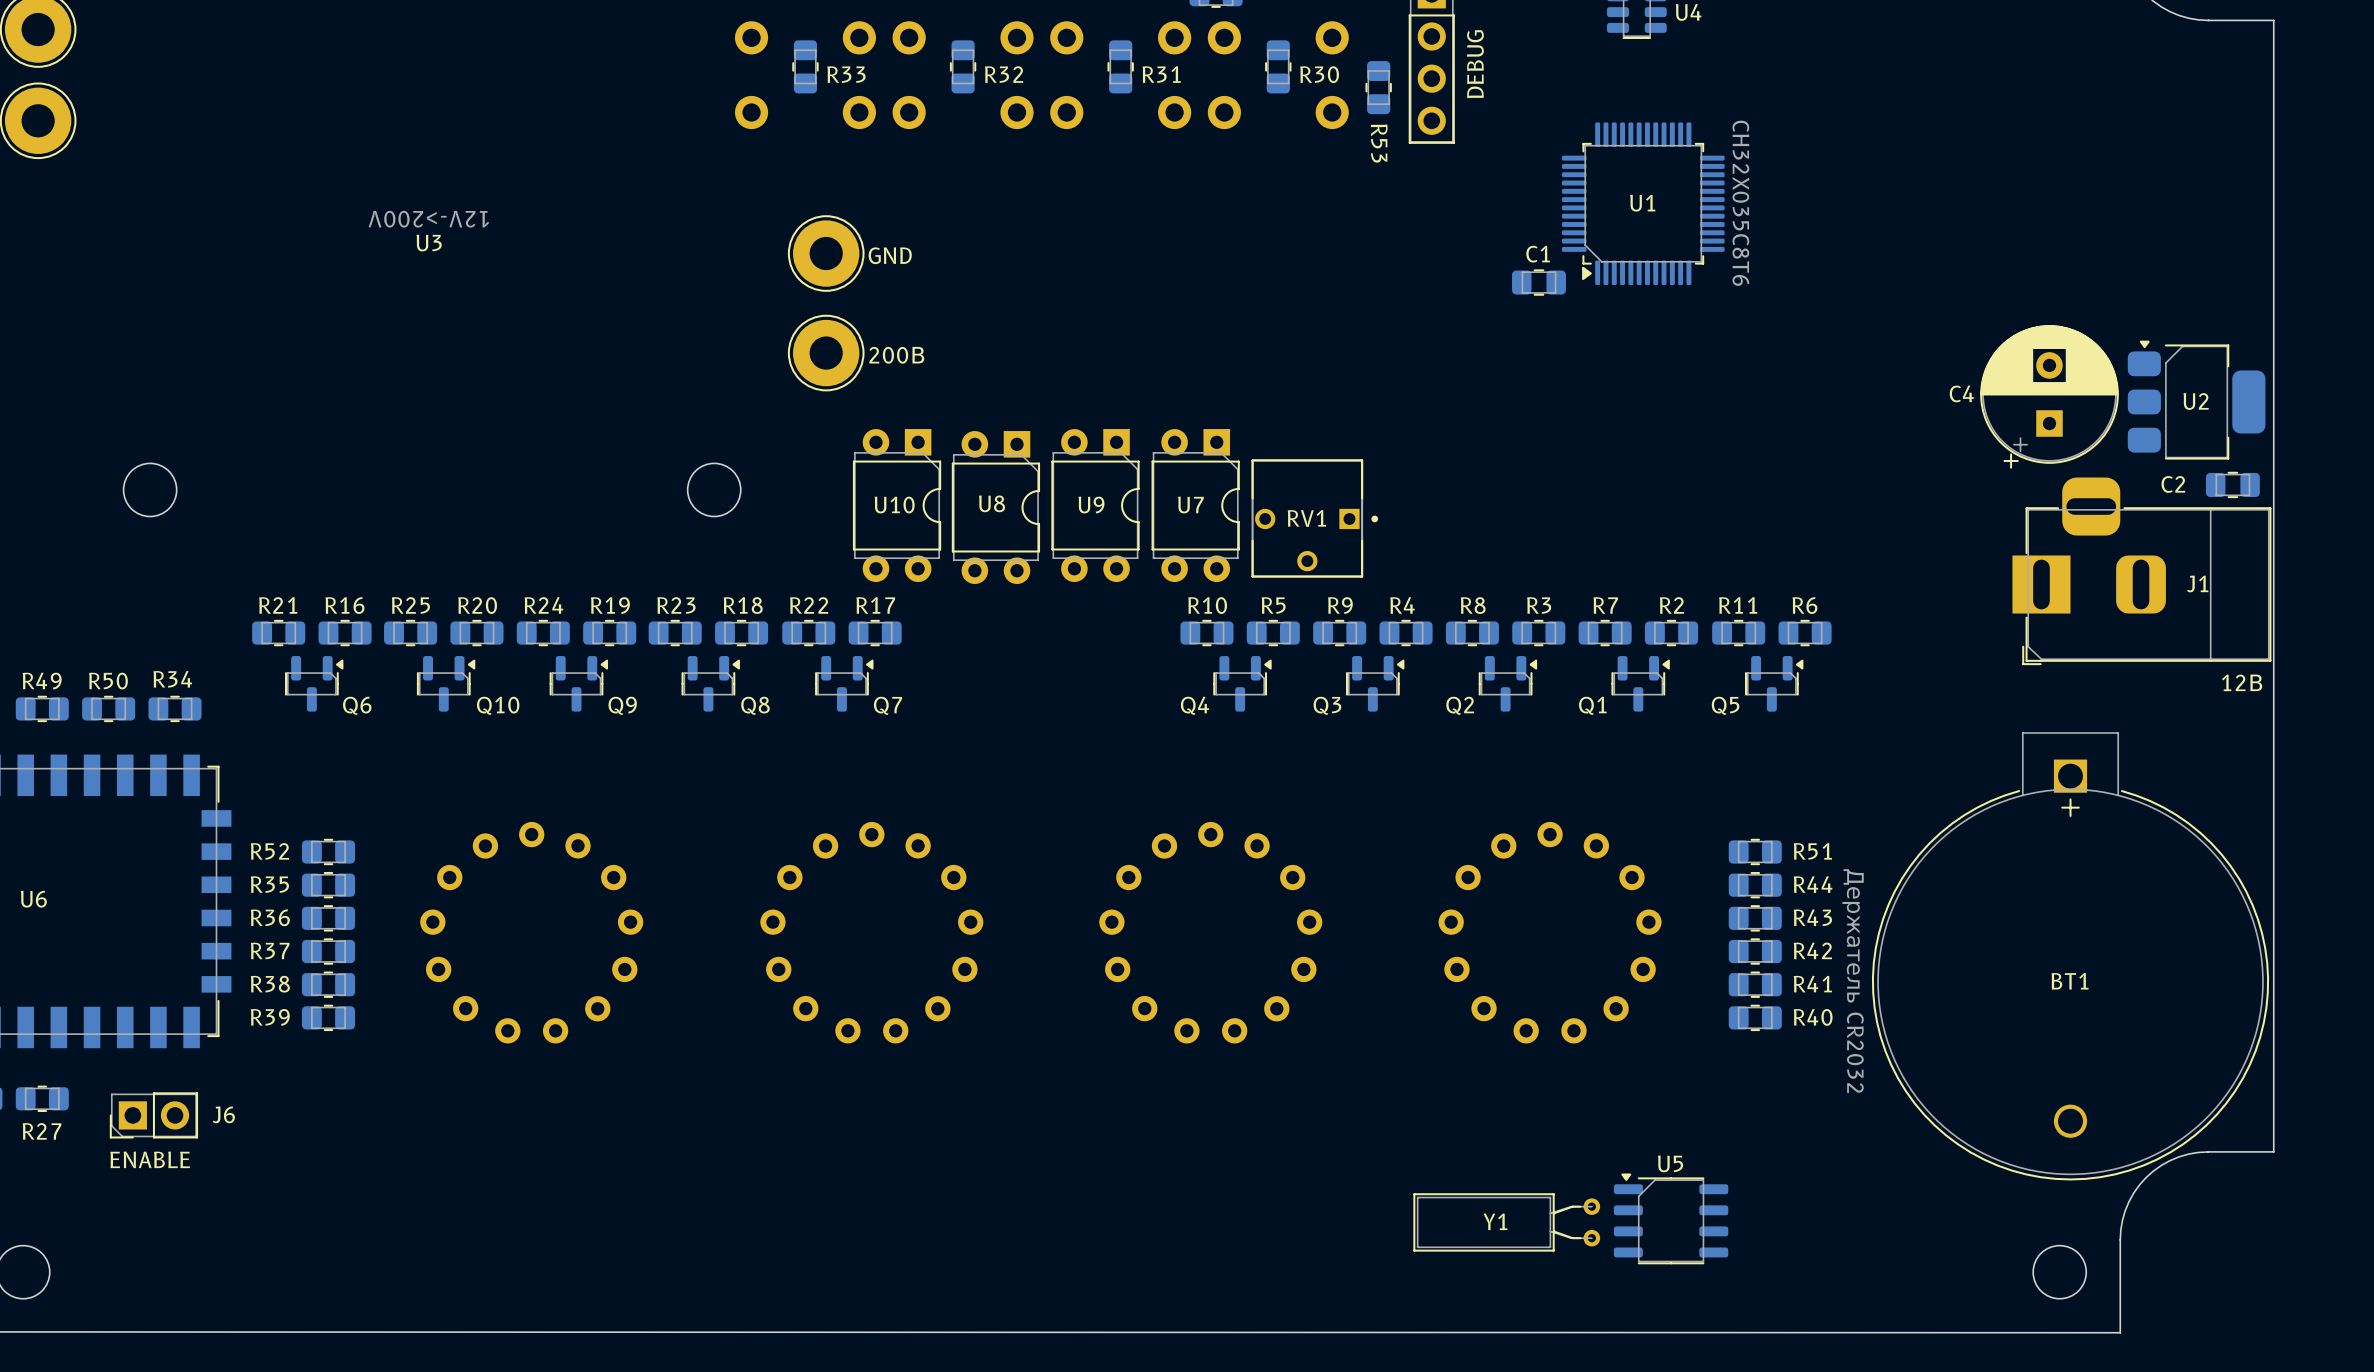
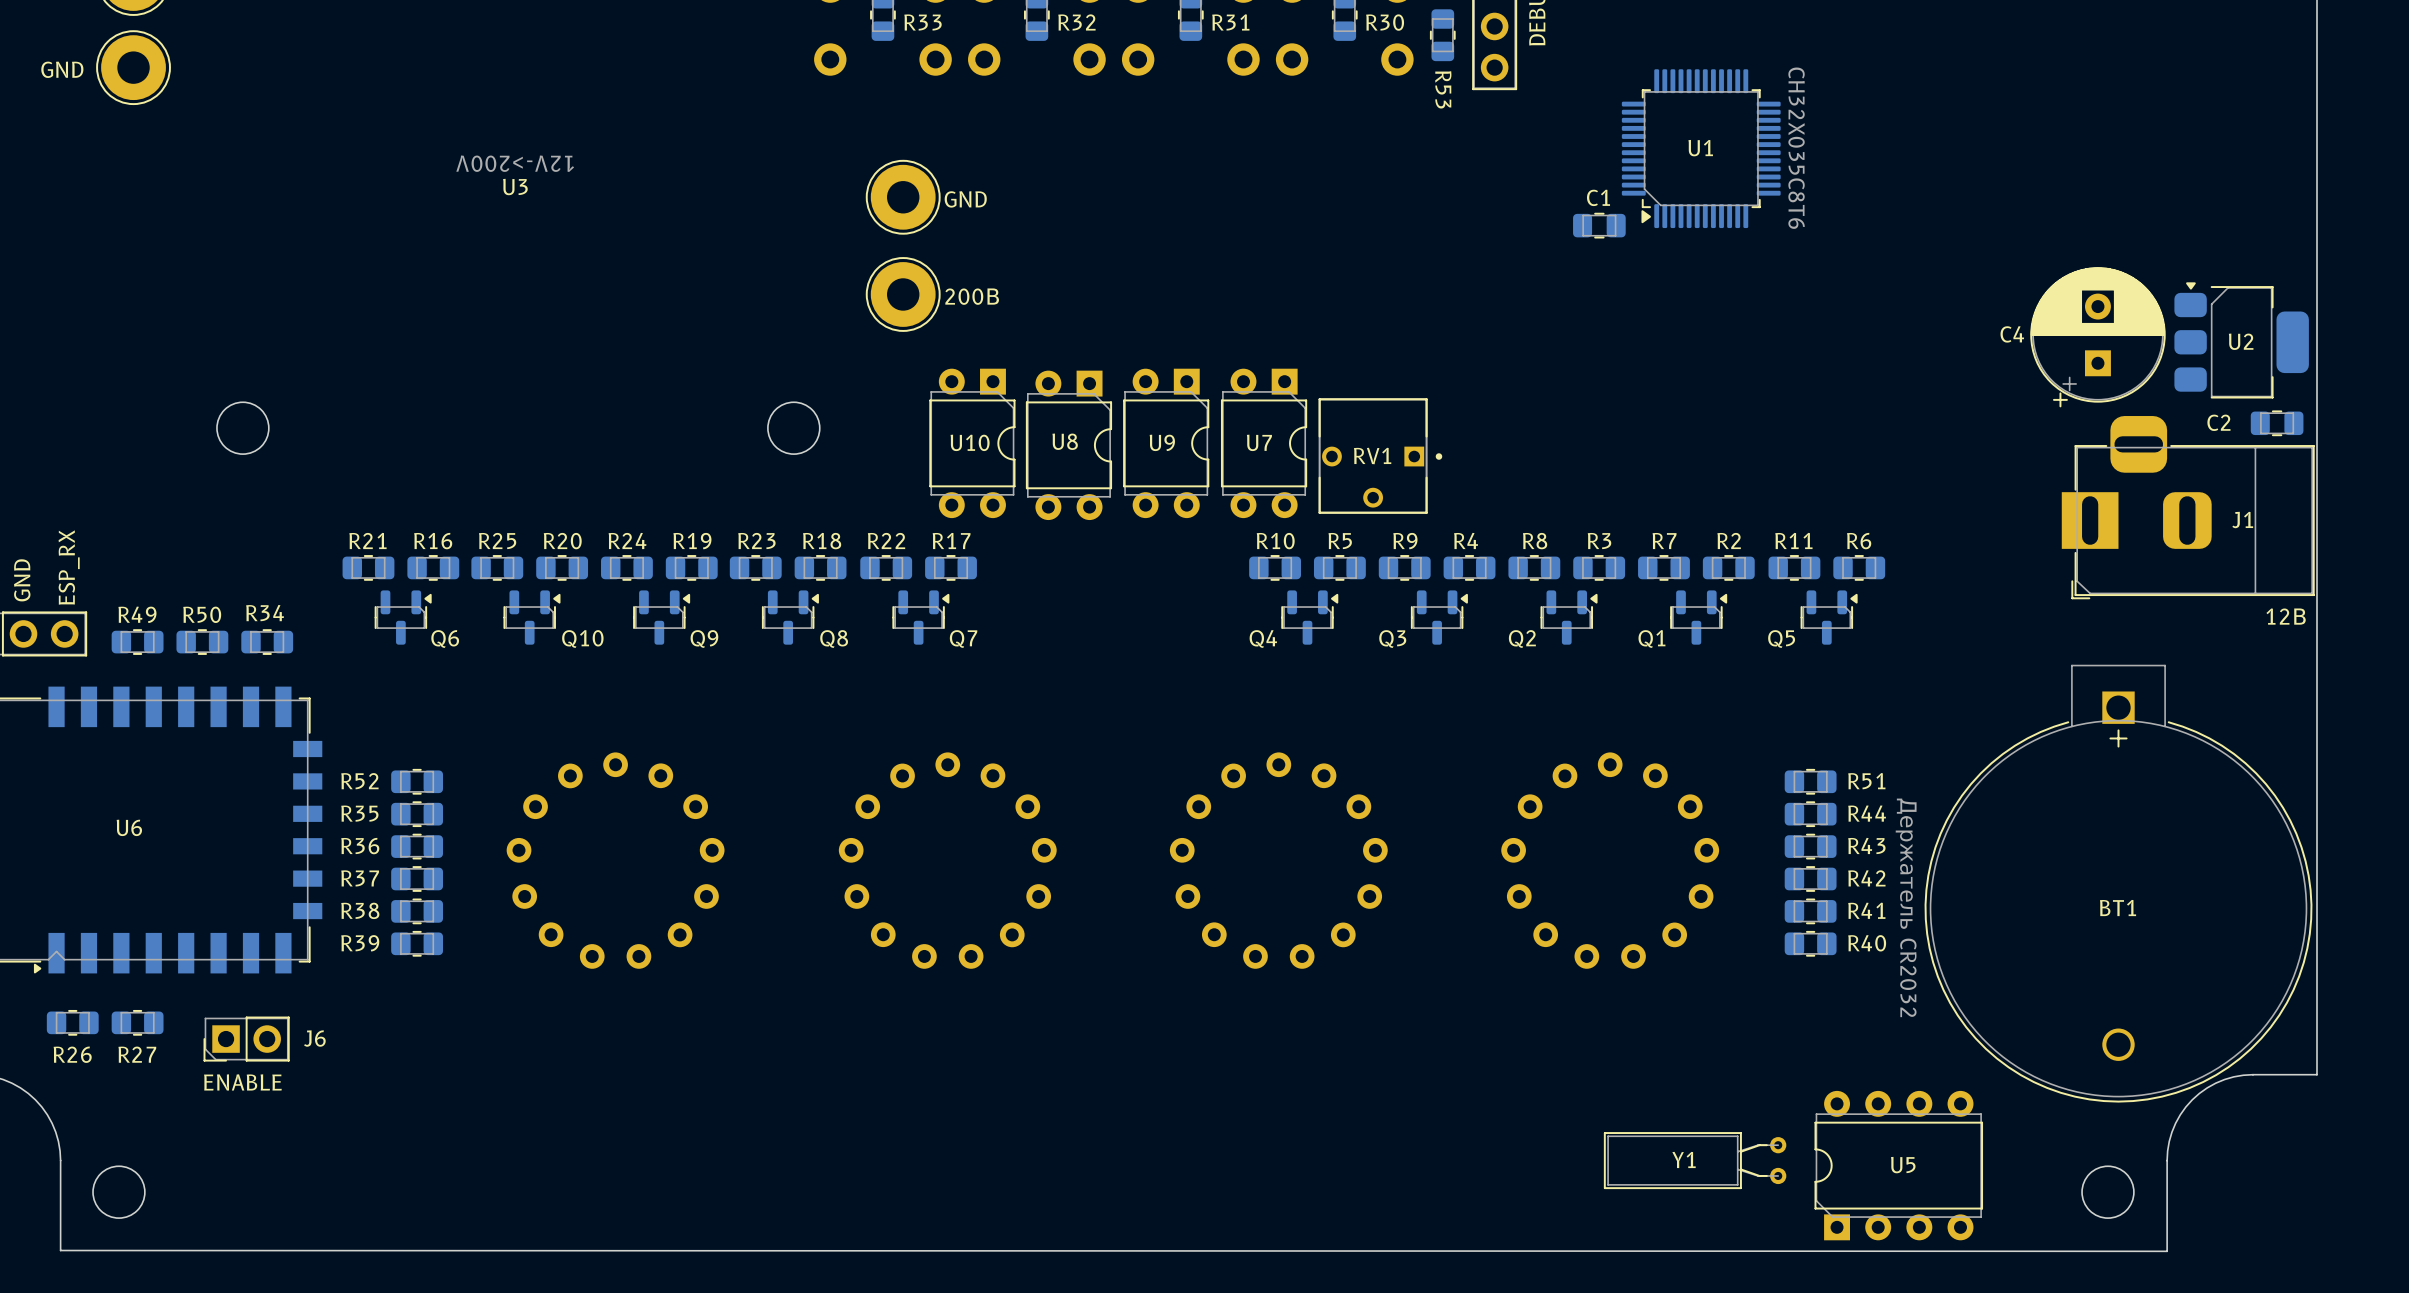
U5 name position: U5 (1670, 1163) -> U5 (1903, 1165)
U5 footprint: [1613, 1173, 1729, 1265] -> [1814, 1090, 1984, 1241]
Y1 position: (1506, 1222) -> (1695, 1160)

